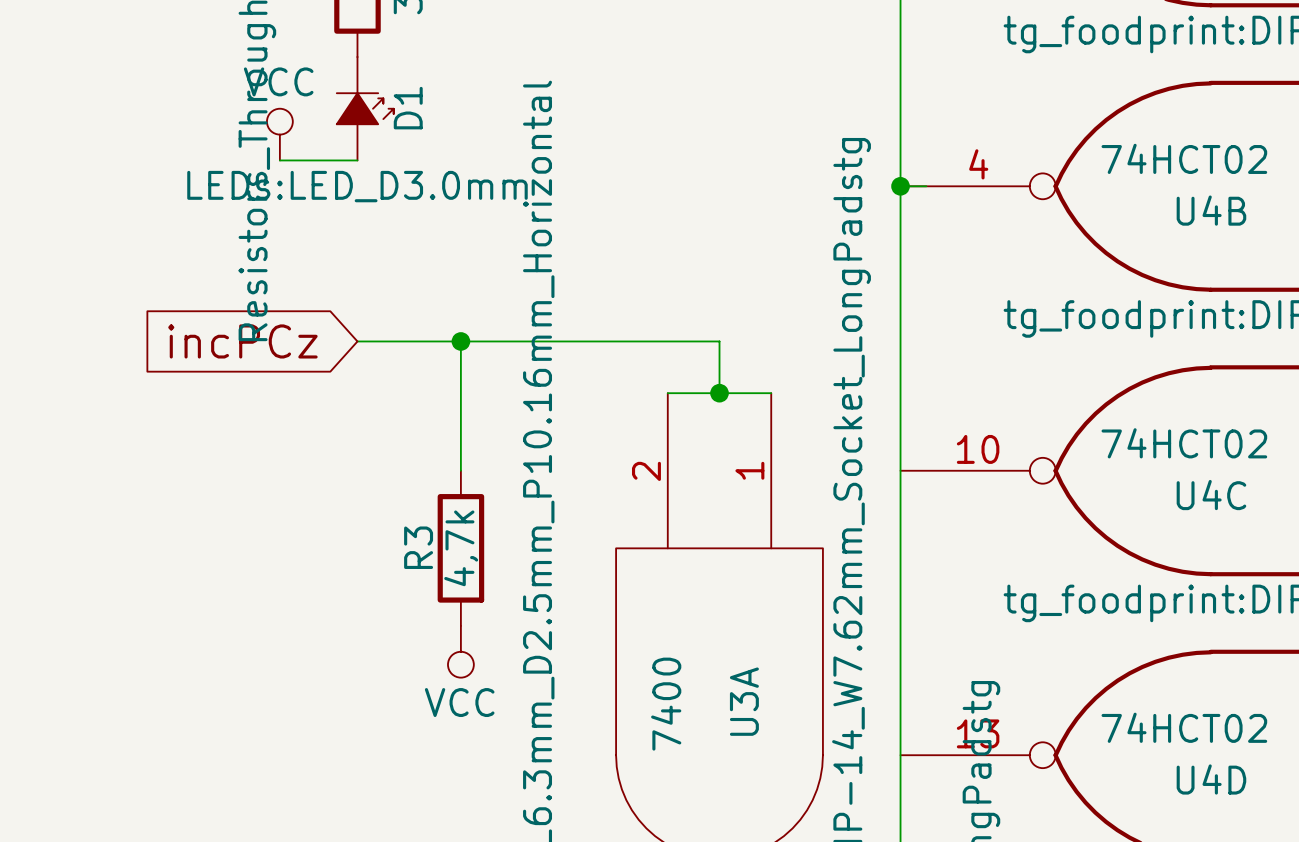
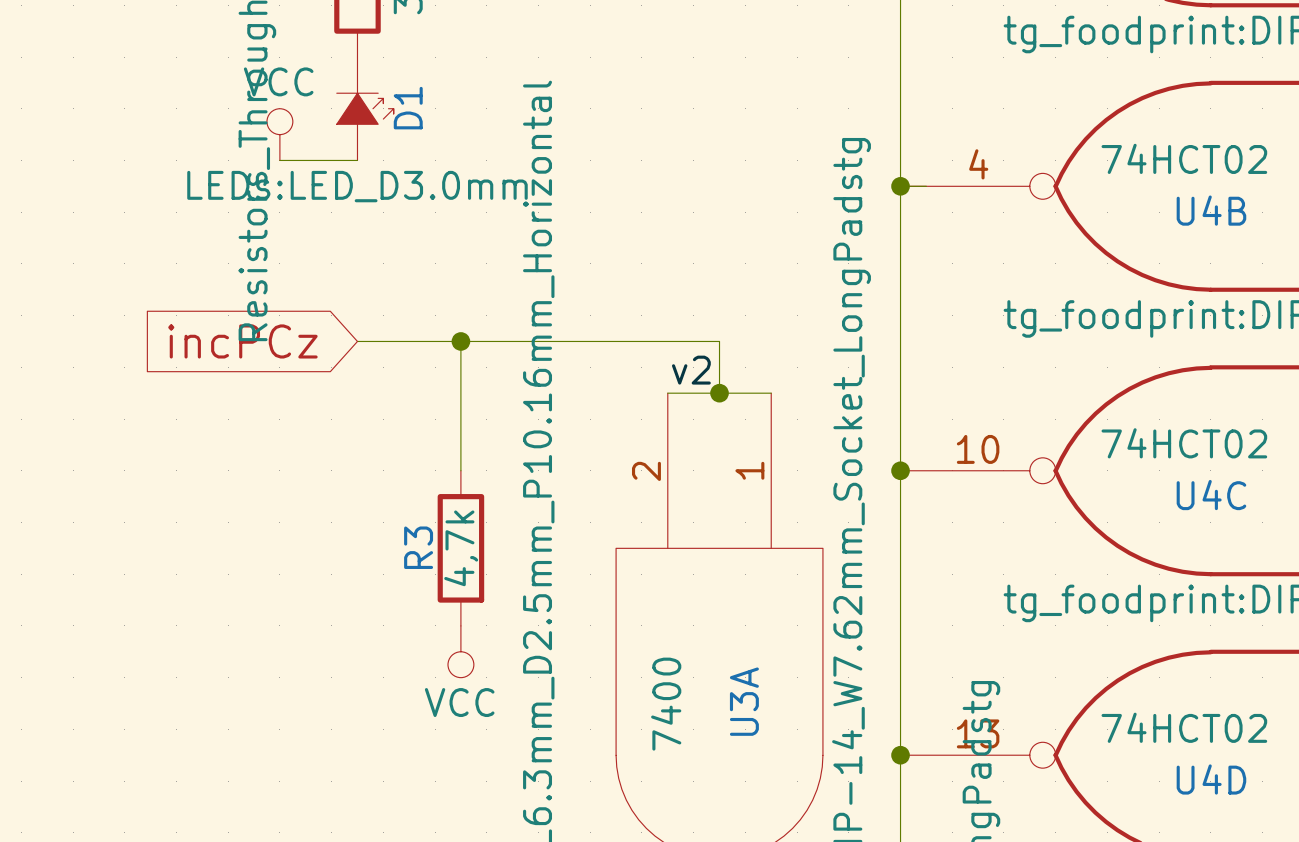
label: none -> v2 (691, 370)
junction: none -> (900, 470)
junction: none -> (900, 755)

